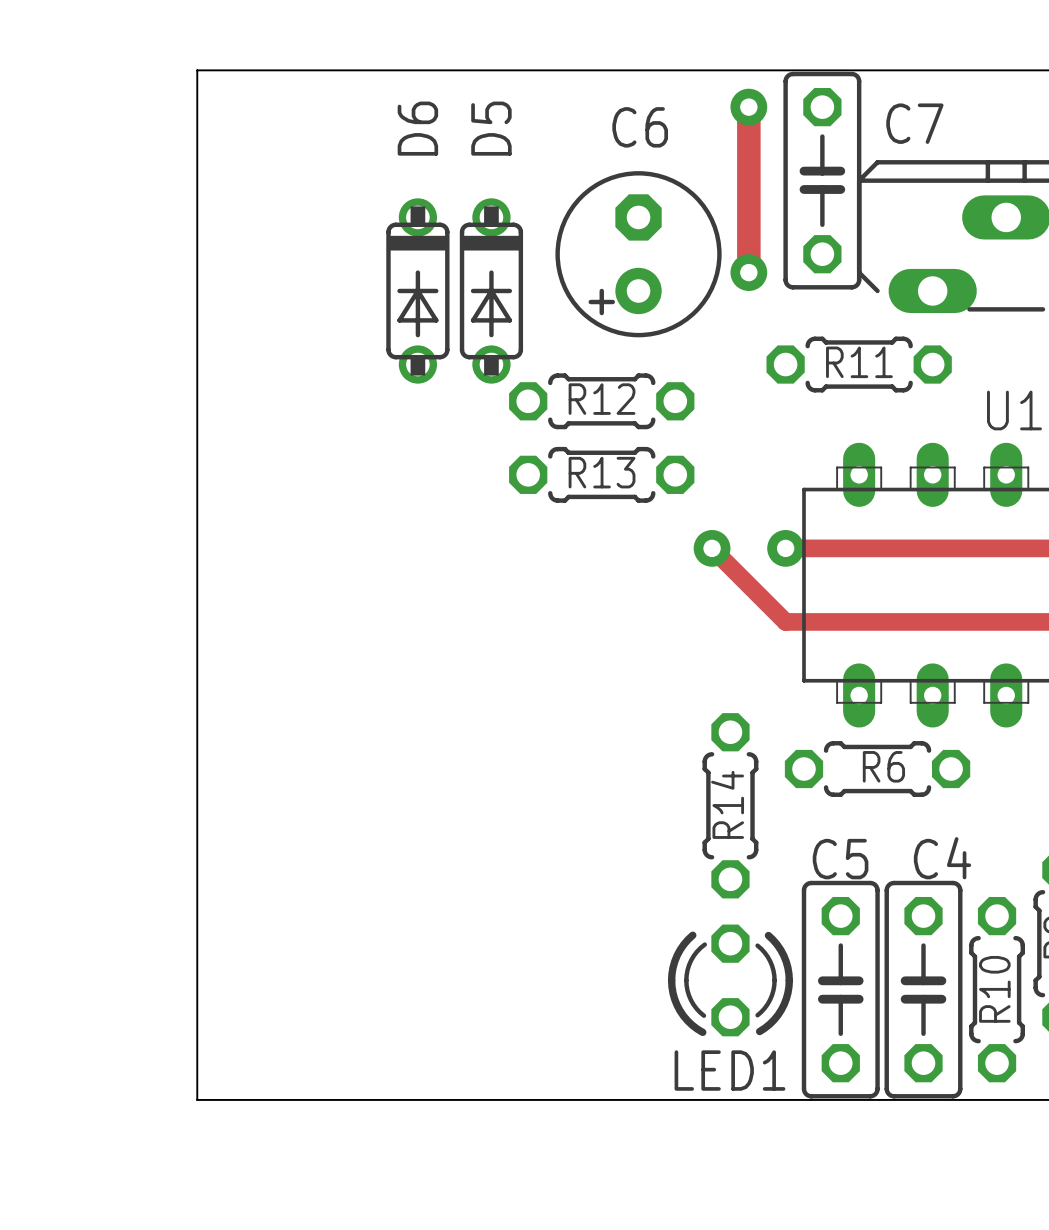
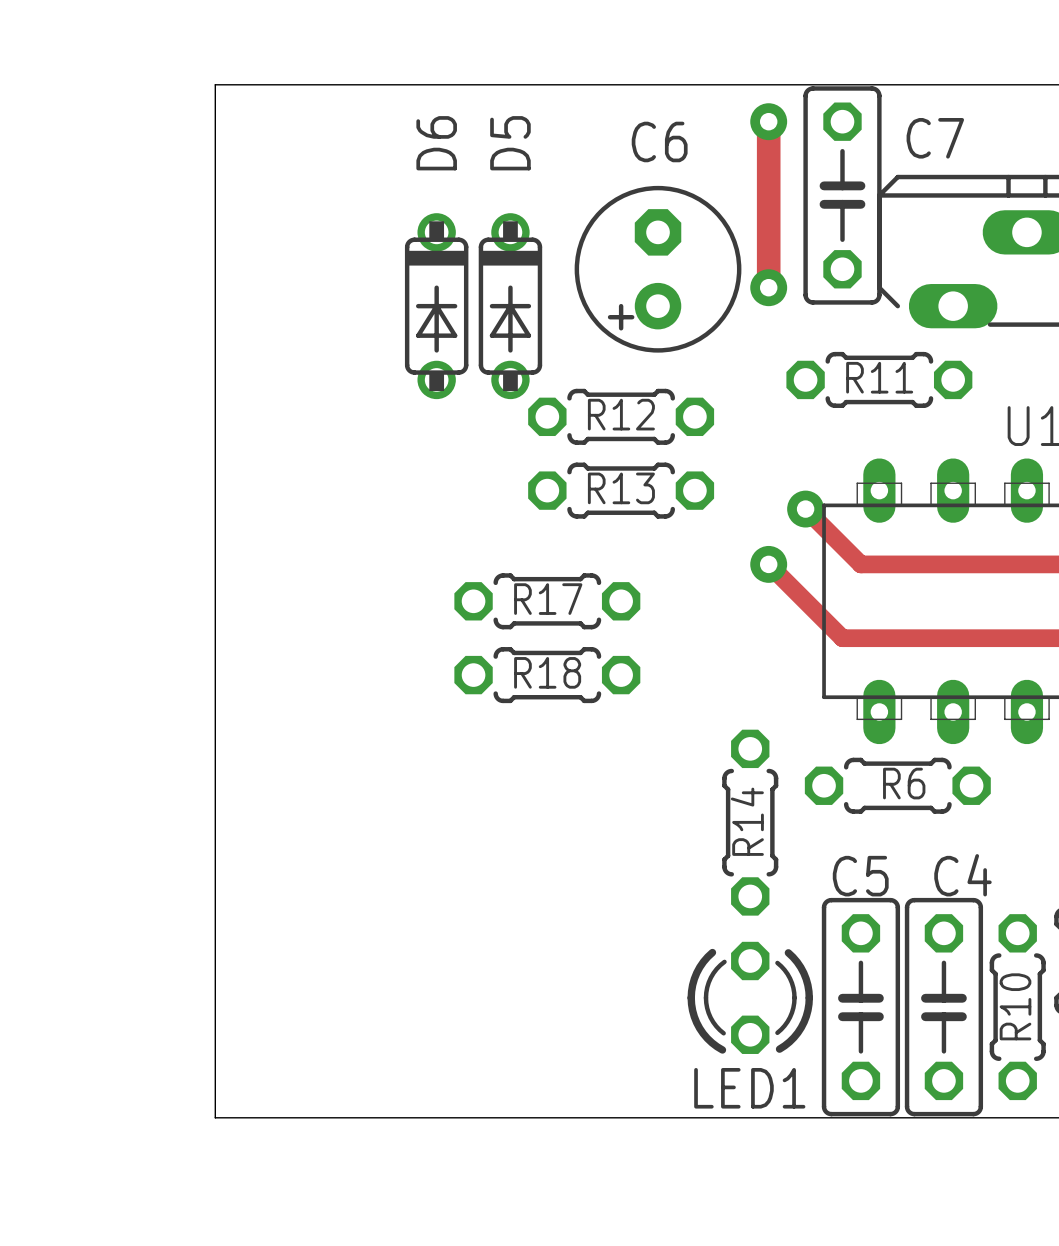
via: none -> (805, 509)
track: (712, 548) (785, 621) (822, 621) -> (768, 564) (842, 638)
via: (712, 548) -> none
via: none -> (768, 564)
track: (785, 548) (840, 548) -> (805, 509) (860, 564)
via: (785, 548) -> none
R17: none -> (547, 601)
R18: none -> (547, 675)

